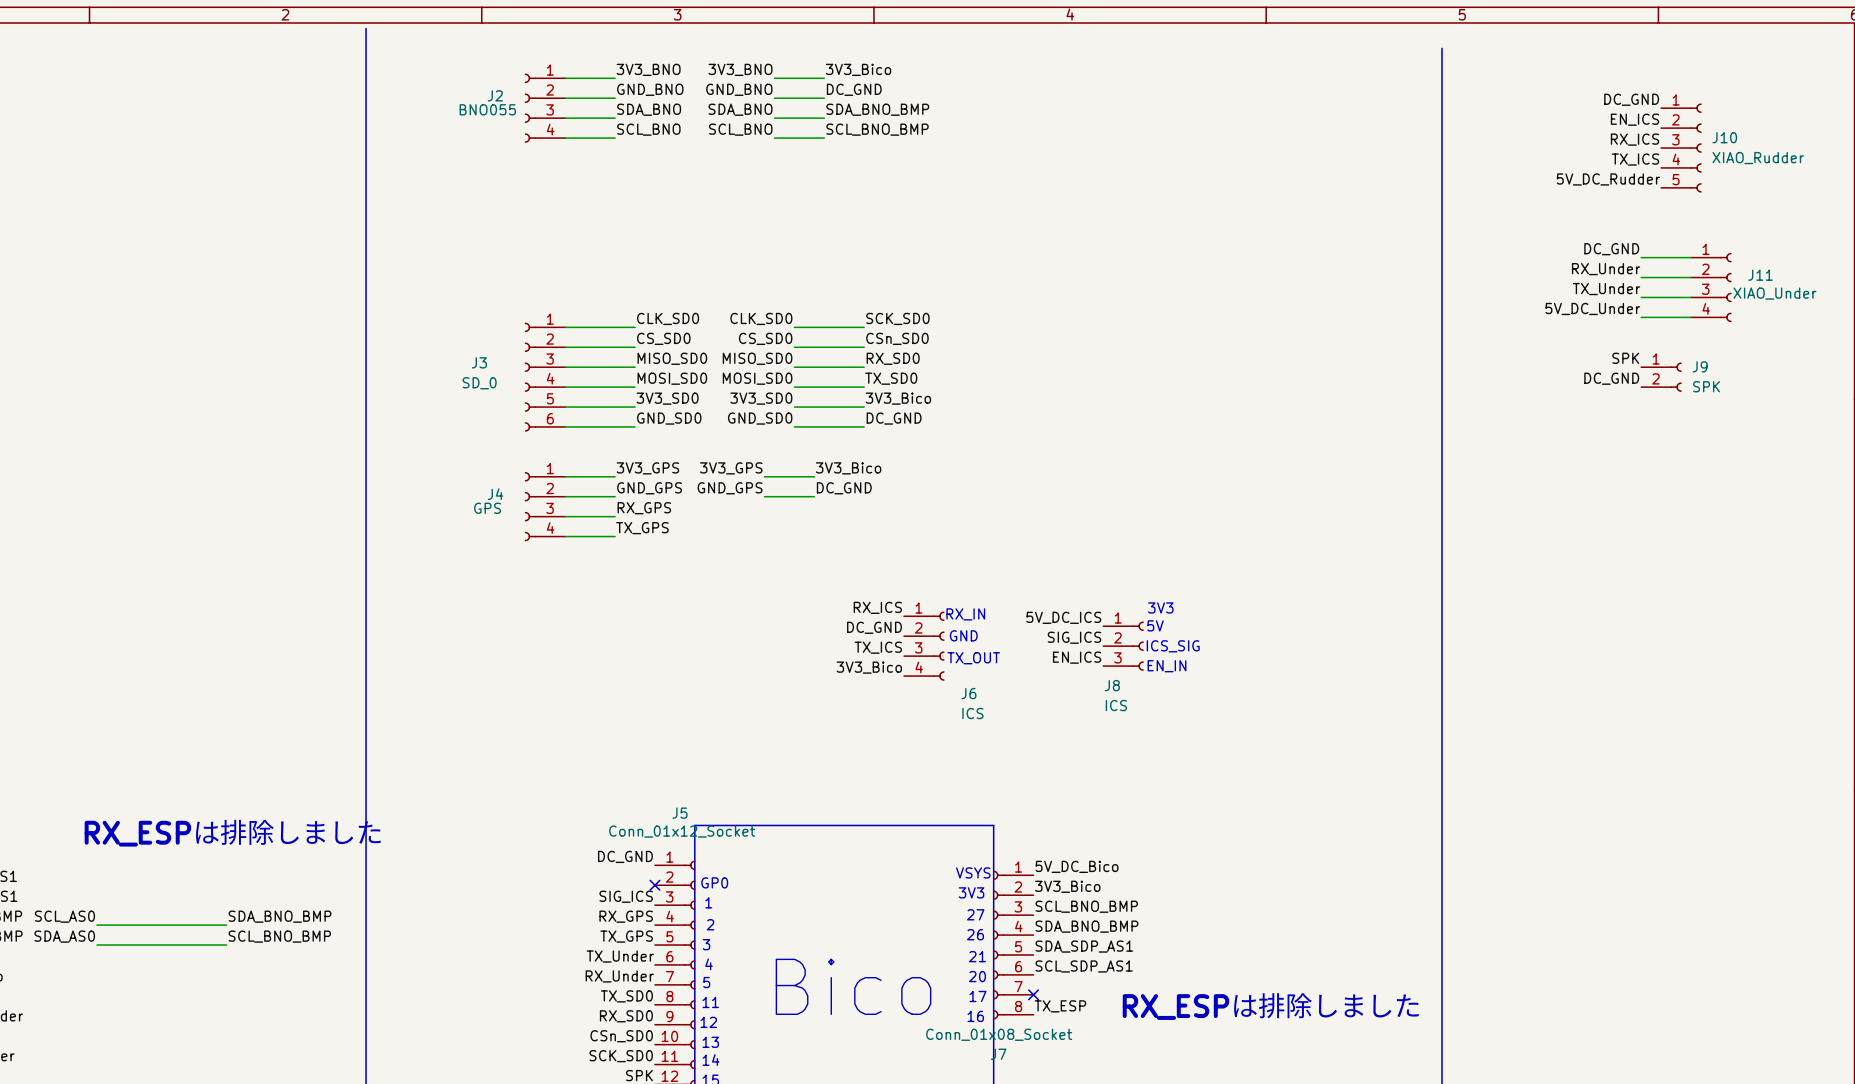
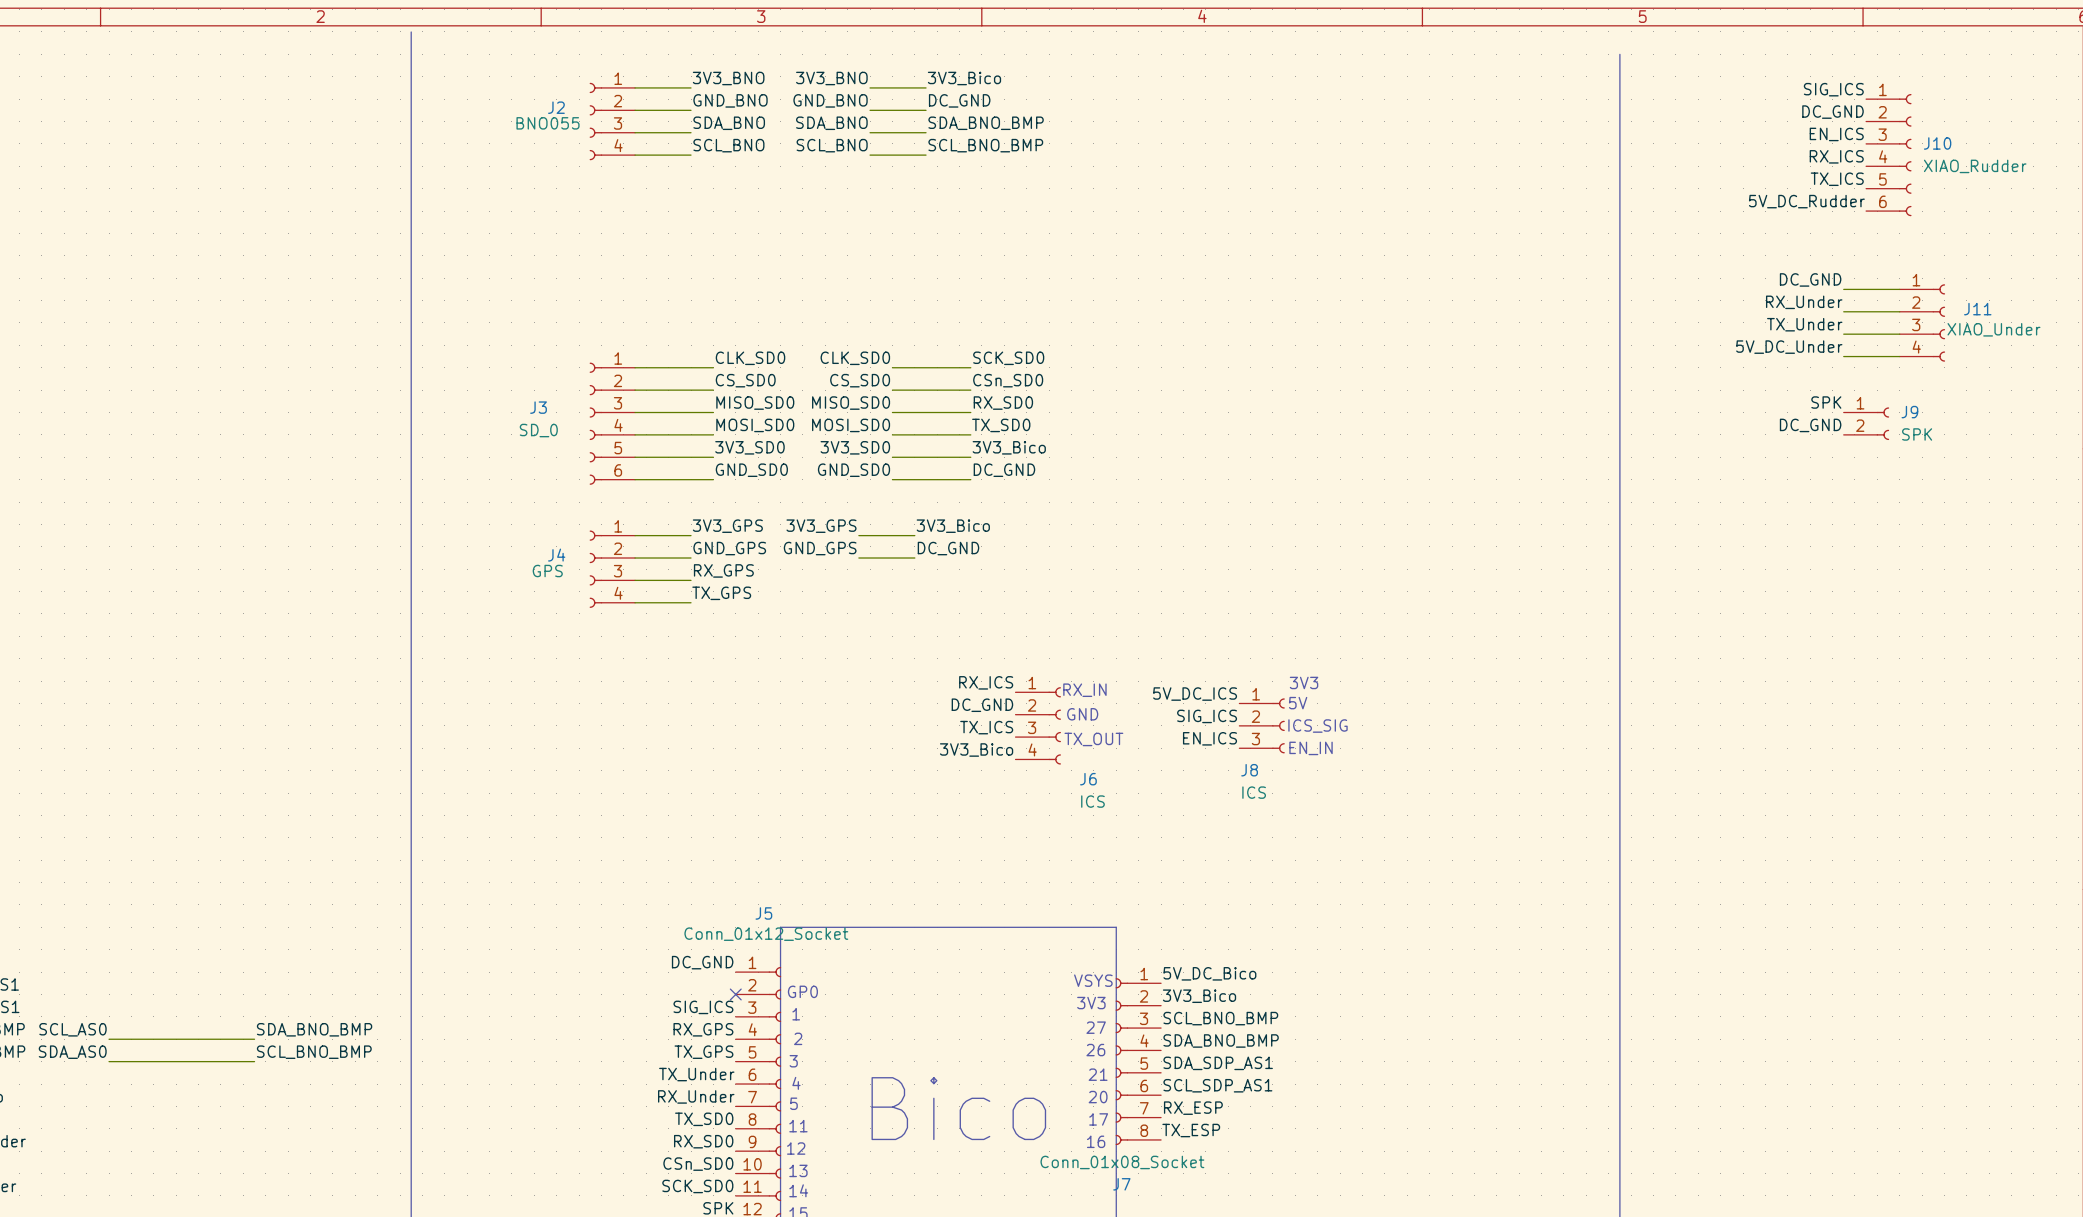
label: none -> SIG_ICS (1833, 89)
J10 symbol: [1661, 103, 1702, 193] -> [1866, 93, 1912, 217]
text: RX_ESPは排除しました (233, 832) -> none
label: none -> RX_ESP (1193, 1108)
no-connect mark: (1033, 994) -> none
text: RX_ESPは排除しました (1271, 1005) -> none

